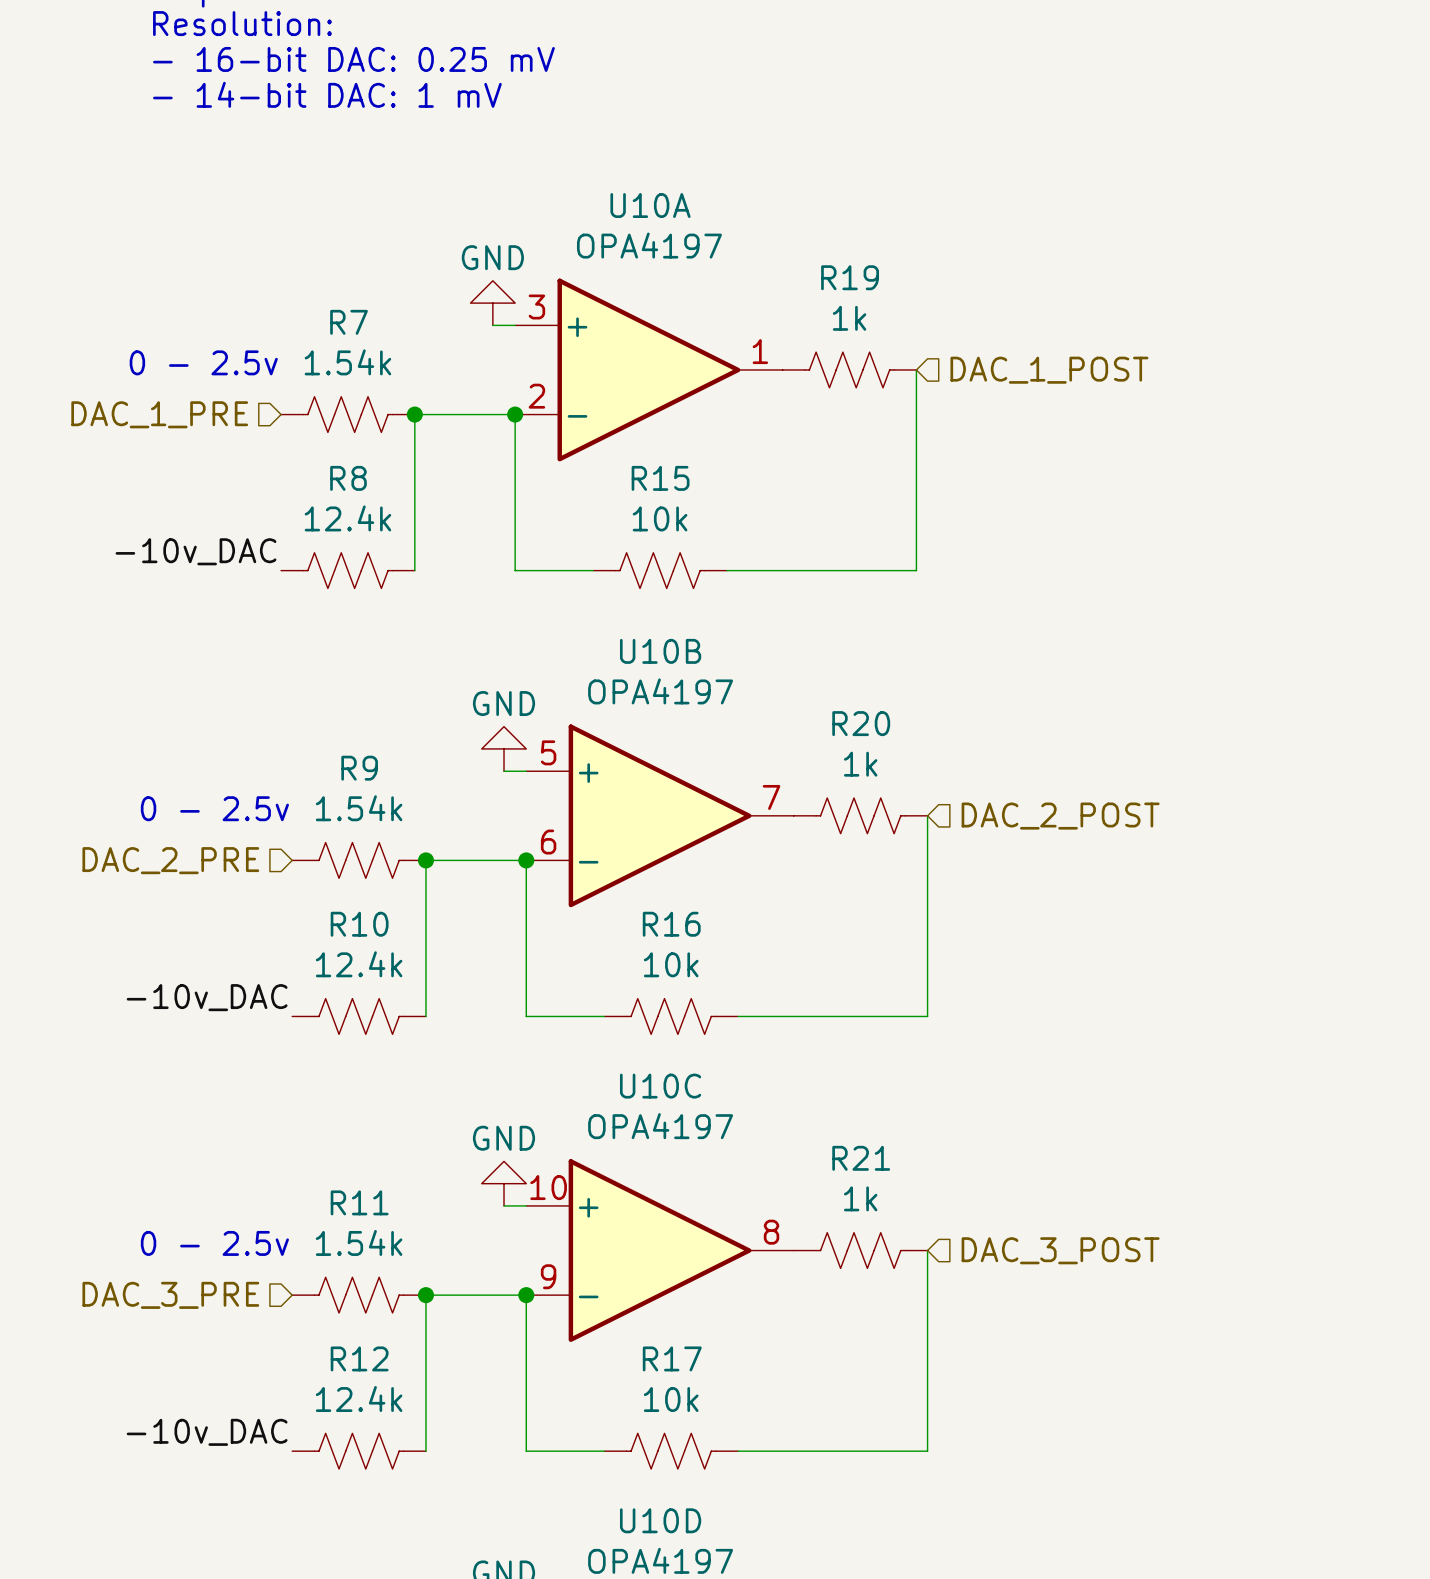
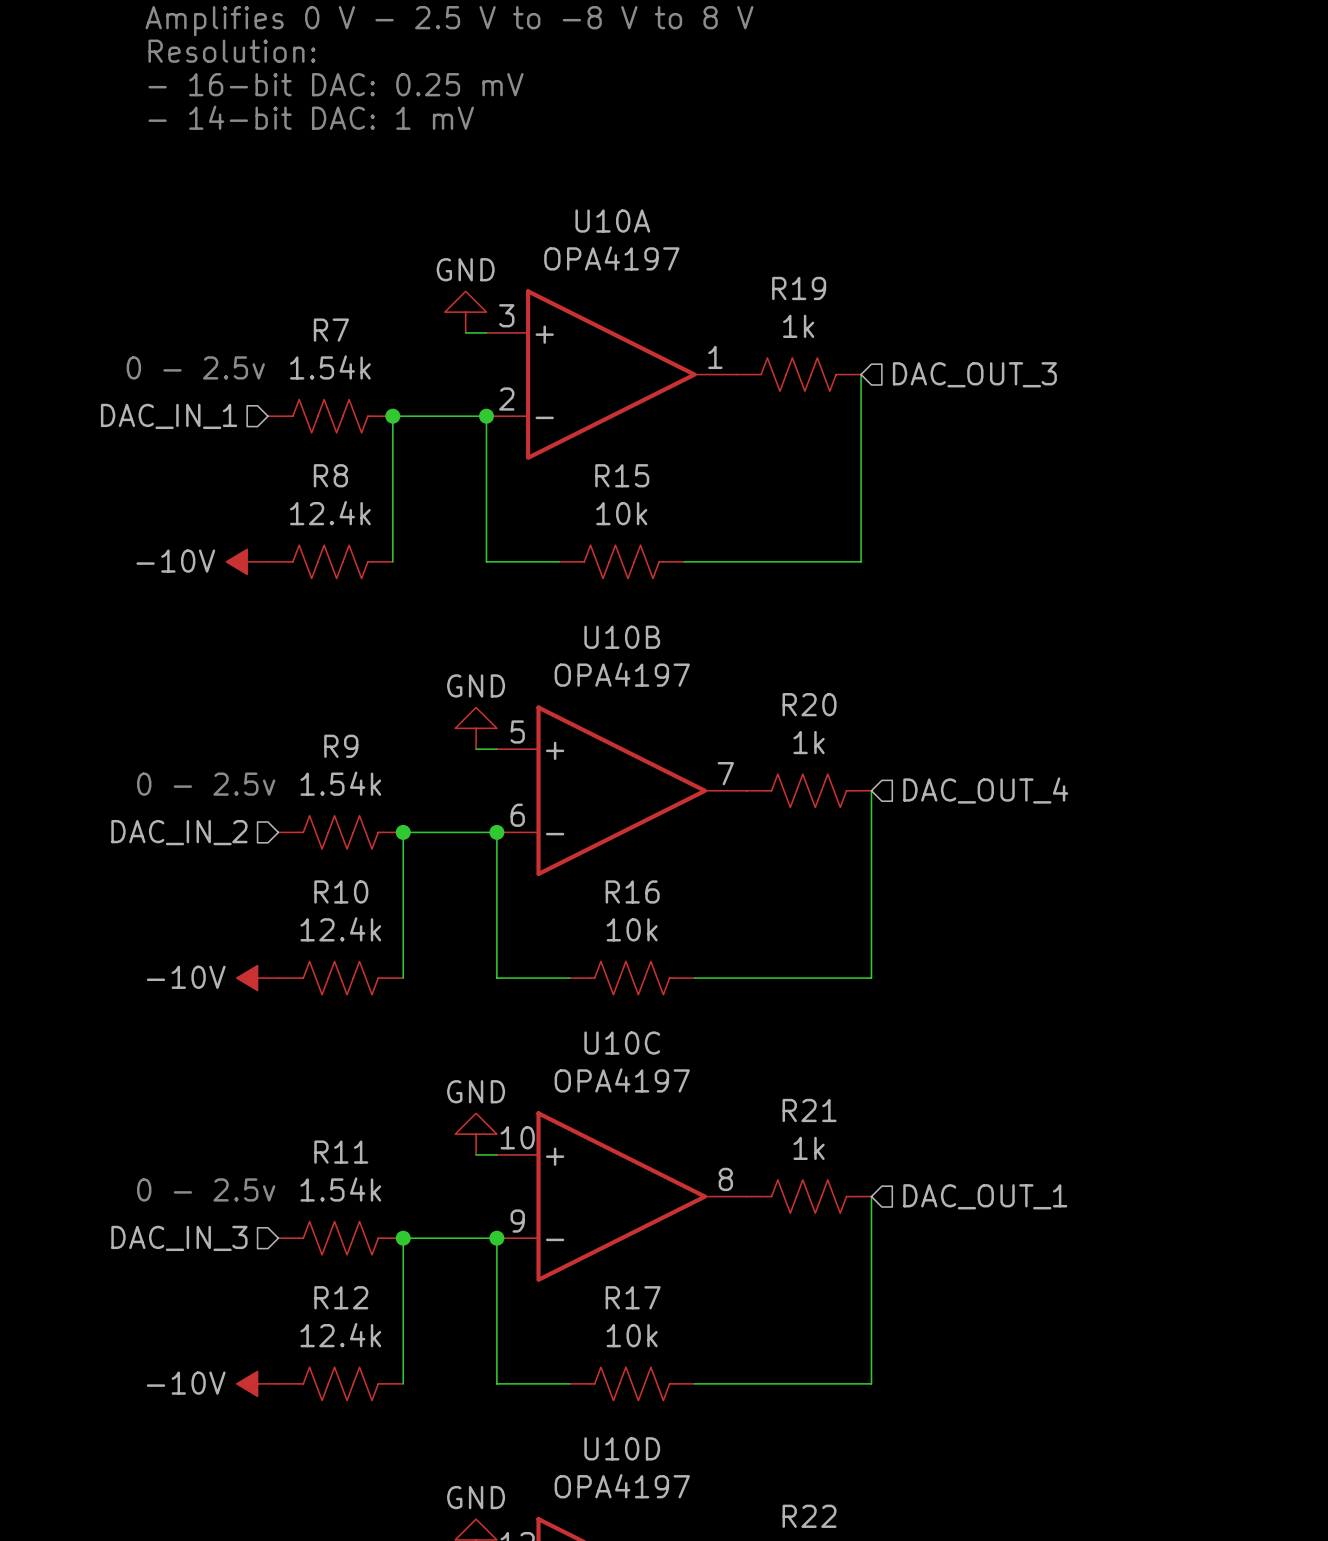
hierarchical label: DAC_1_POST (1049, 370) -> DAC_OUT_3 (974, 374)
hierarchical label: DAC_1_PRE (159, 414) -> DAC_IN_1 (169, 416)
label: -10v_DAC (195, 551) -> none
power symbol: none -> -10V (247, 561)
hierarchical label: DAC_2_POST (1060, 816) -> DAC_OUT_4 (985, 790)
hierarchical label: DAC_2_PRE (170, 860) -> DAC_IN_2 (179, 832)
label: -10v_DAC (207, 997) -> none
power symbol: none -> -10V (257, 978)
hierarchical label: DAC_3_POST (1060, 1250) -> DAC_OUT_1 (985, 1196)
hierarchical label: DAC_3_PRE (170, 1295) -> DAC_IN_3 (179, 1238)
label: -10v_DAC (207, 1432) -> none
power symbol: none -> -10V (257, 1383)

